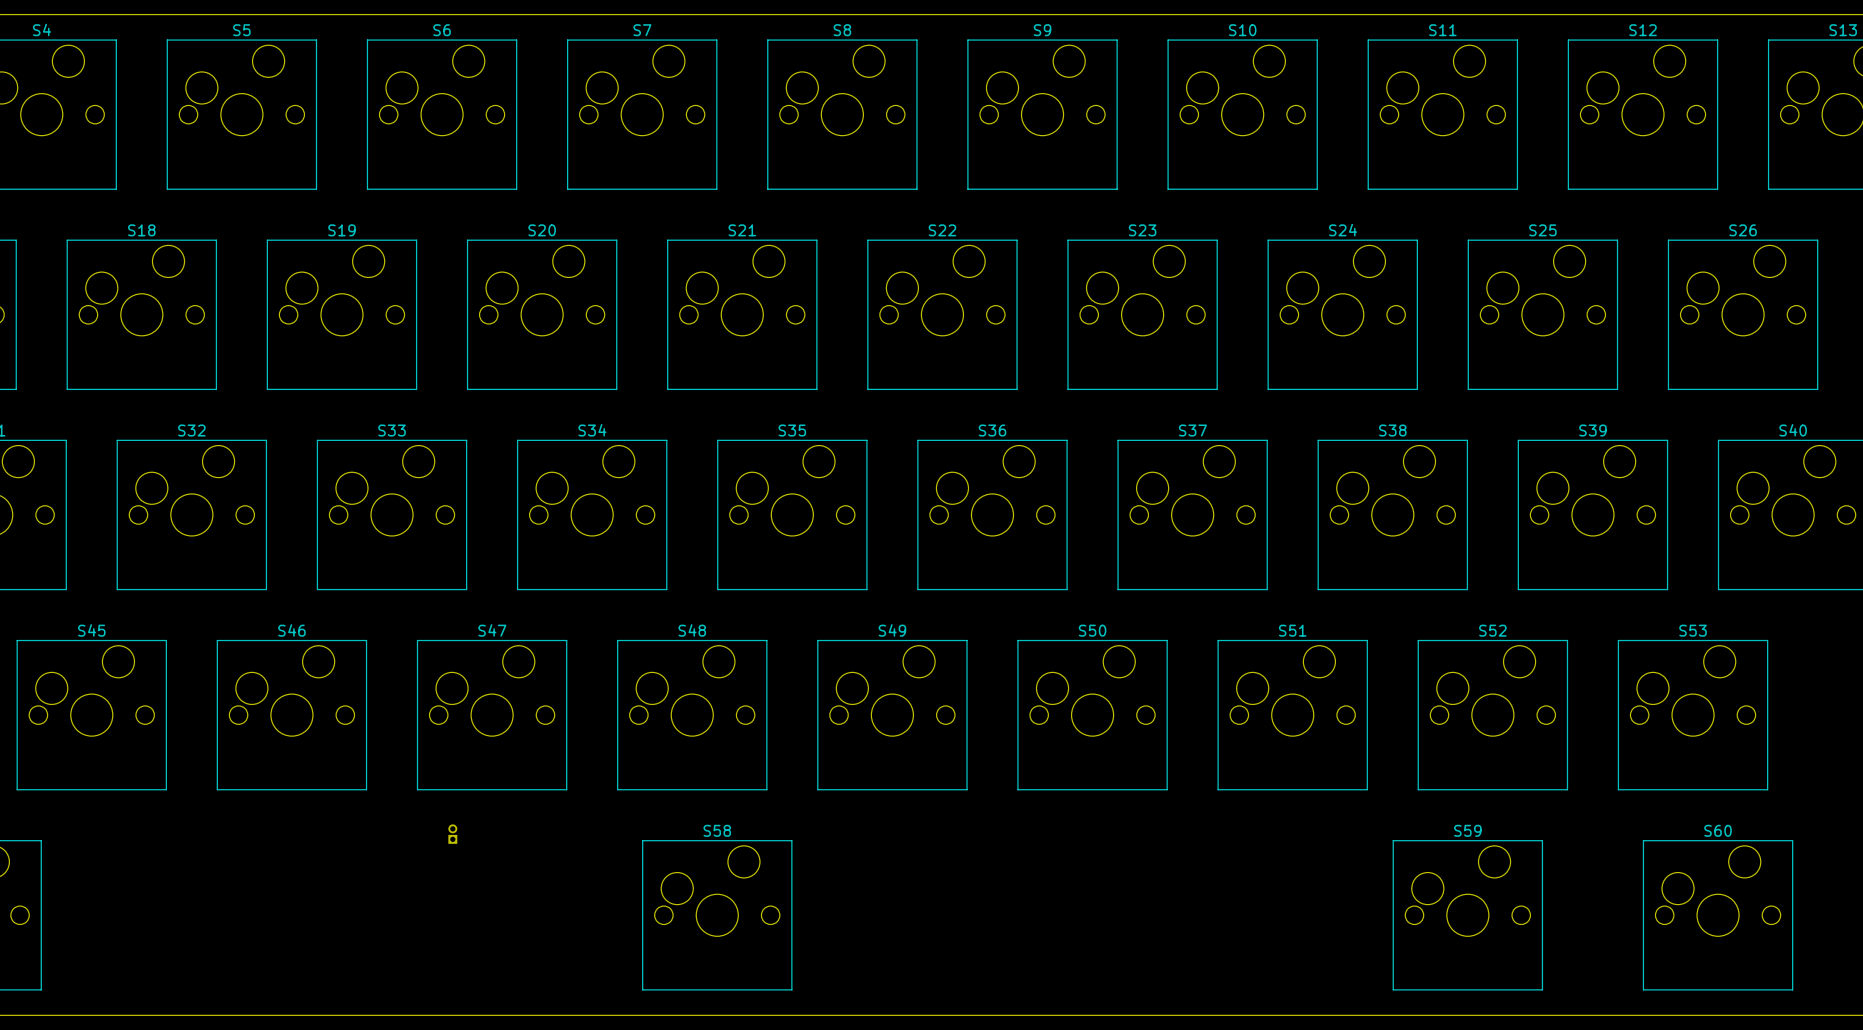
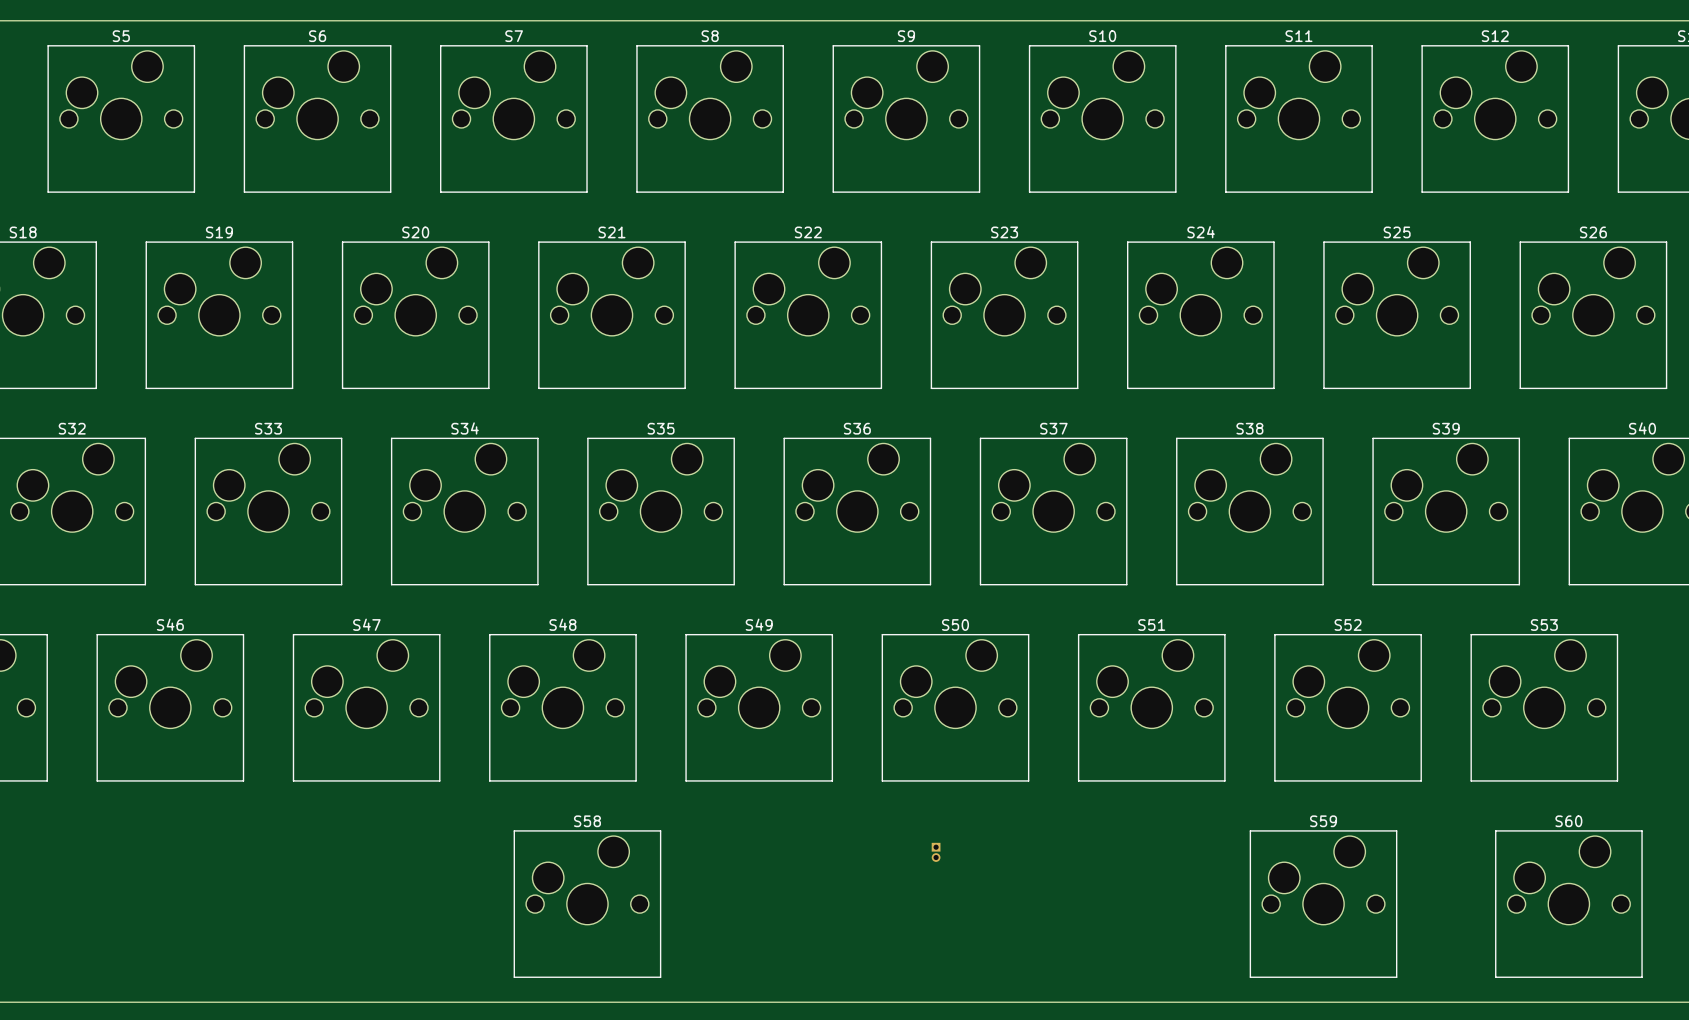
part: (452, 834) -> none
part: none -> (936, 852)

